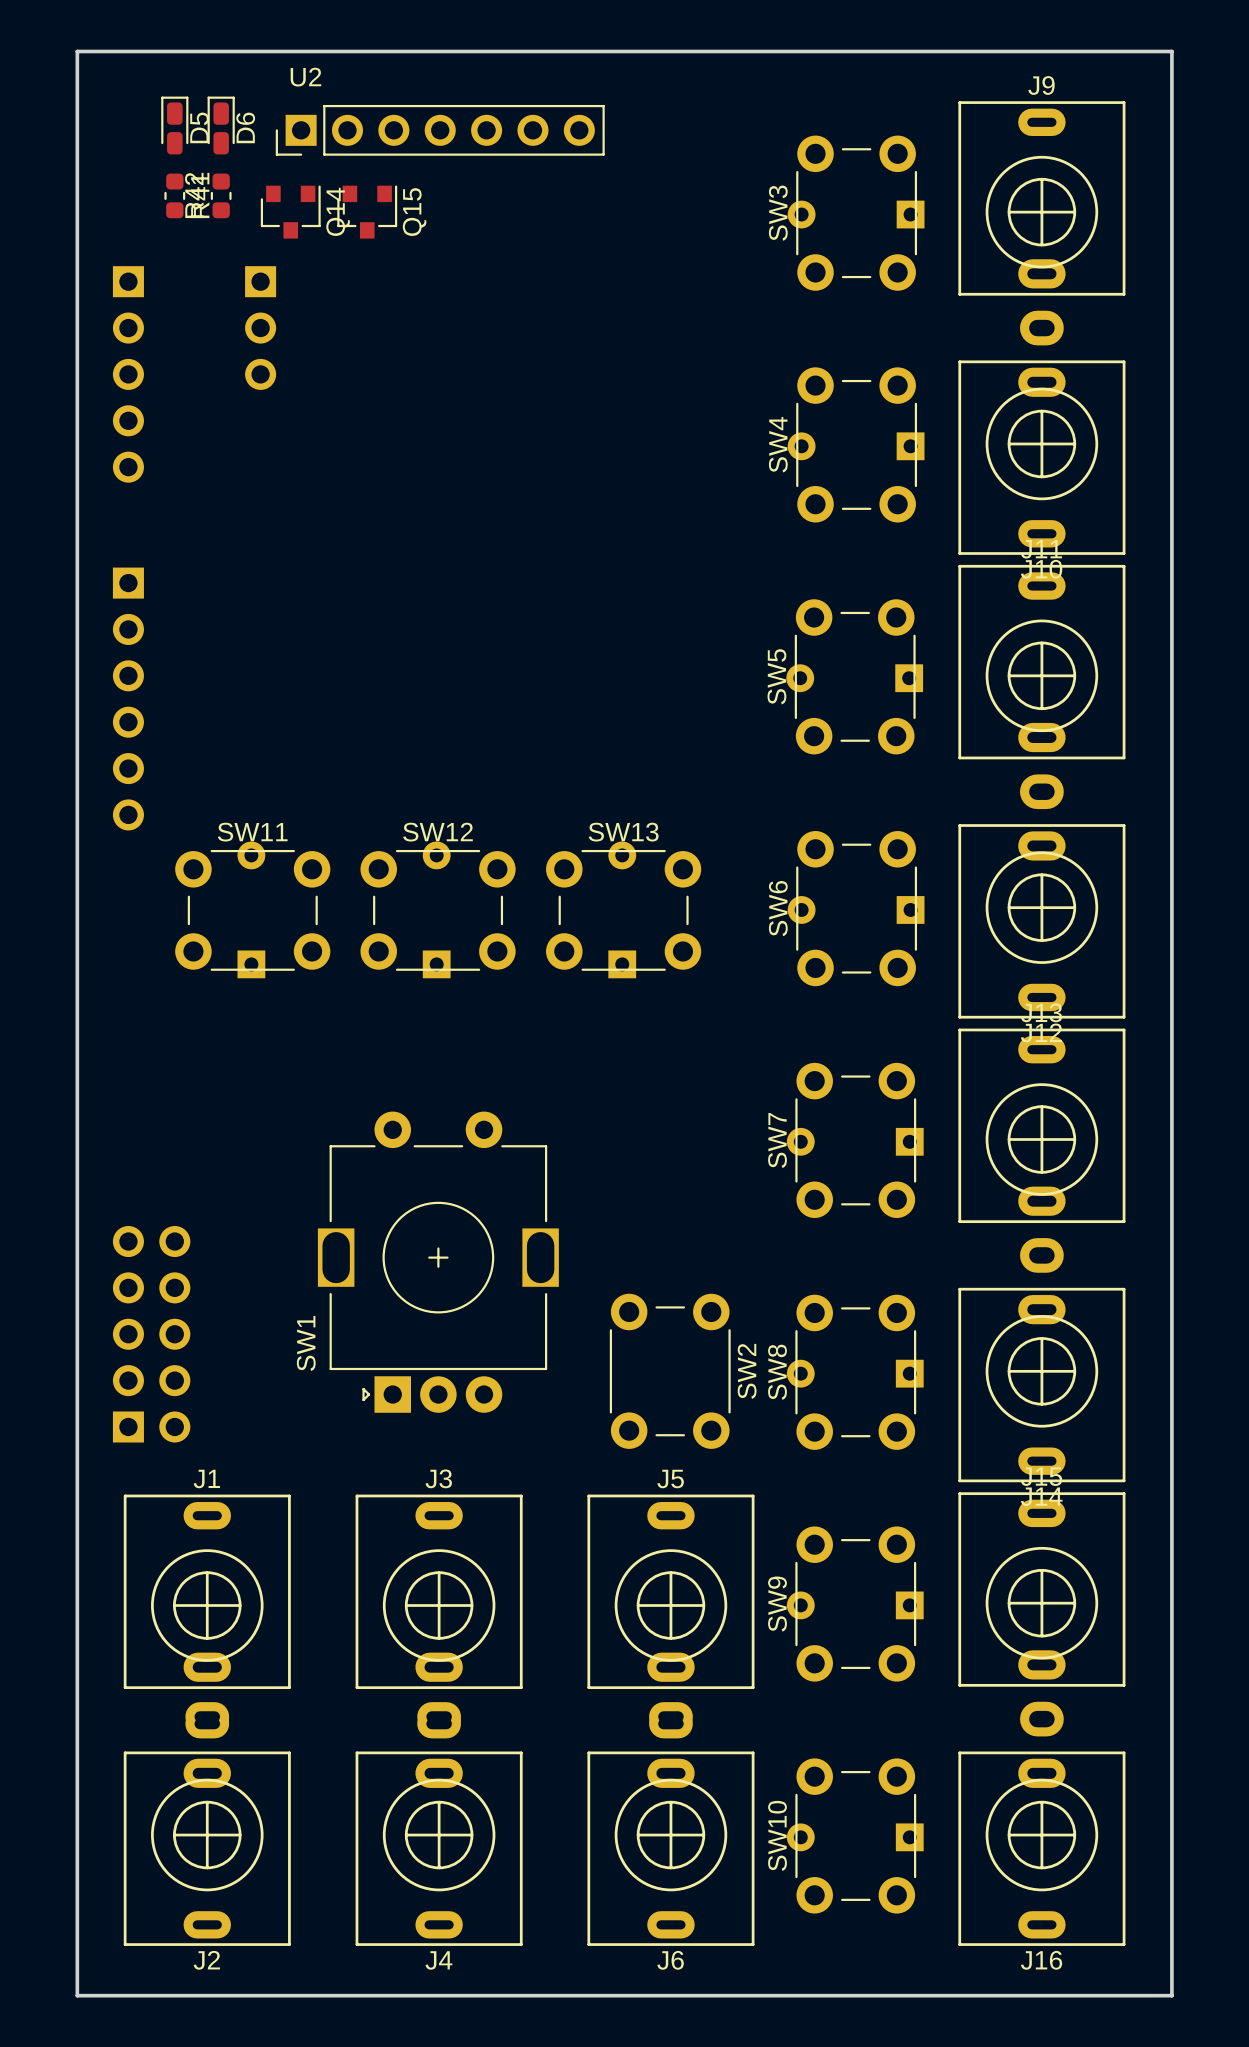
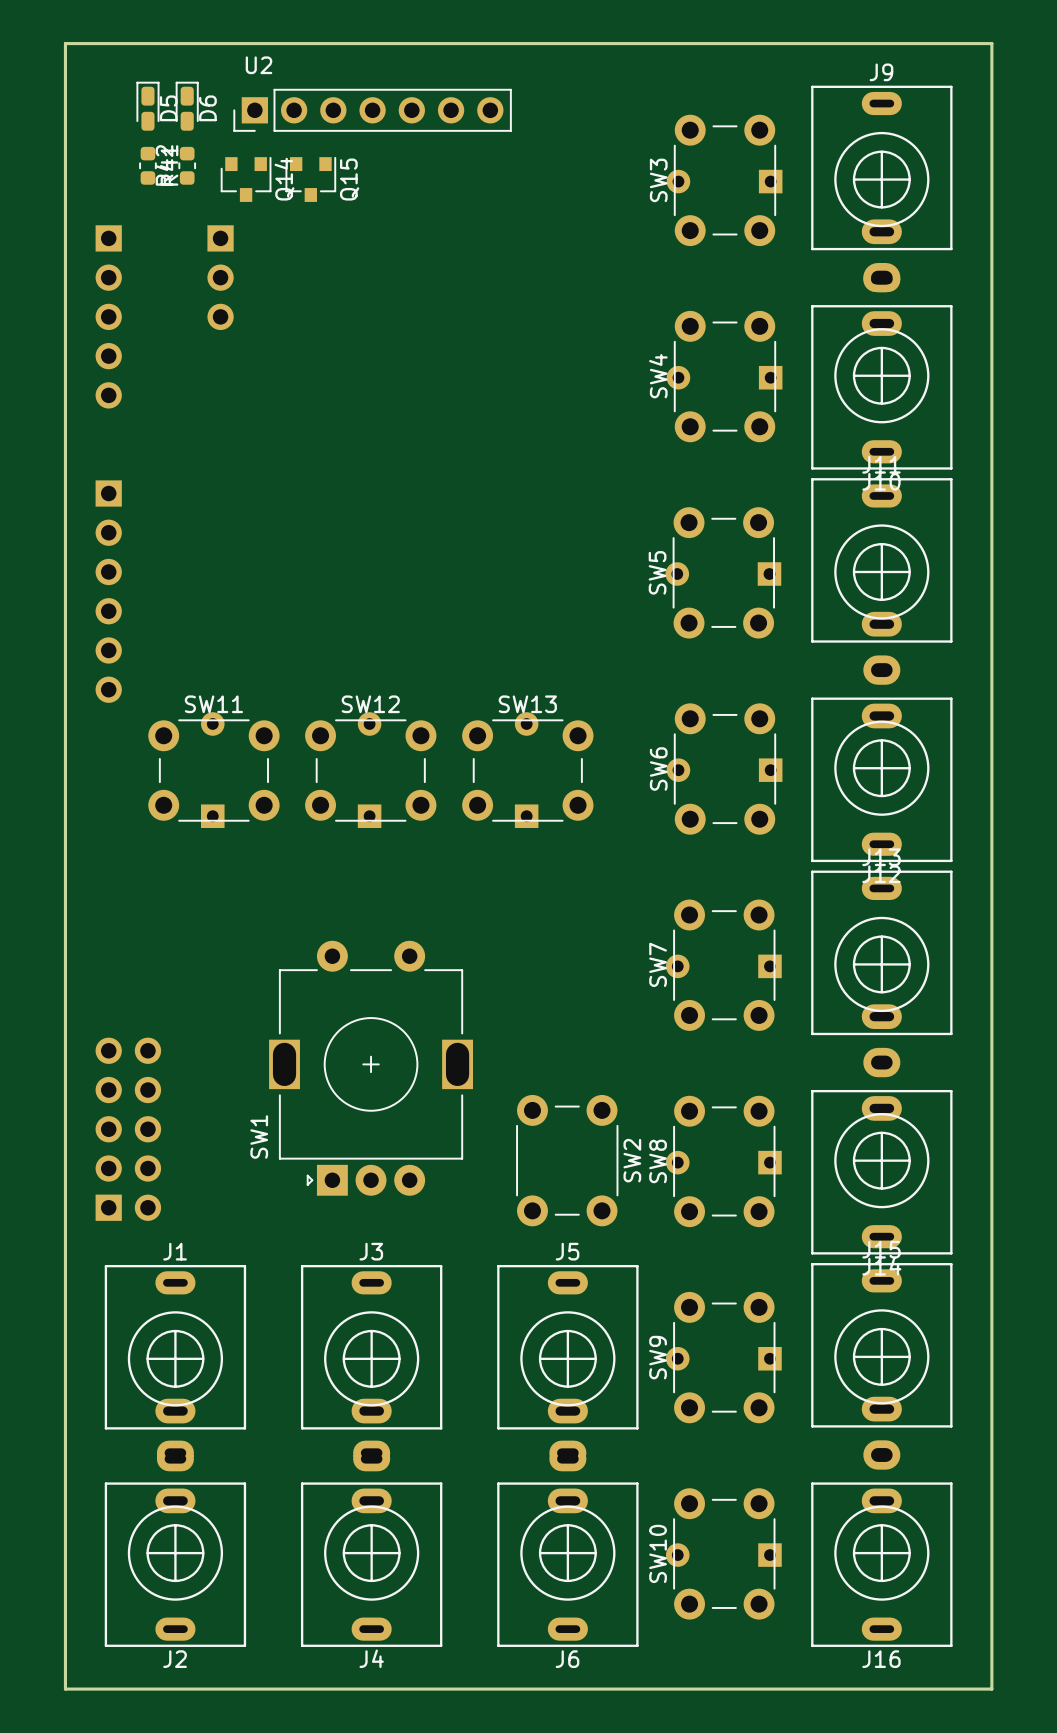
J9 footprint: [958, 101, 1126, 296] -> [811, 85, 953, 293]

